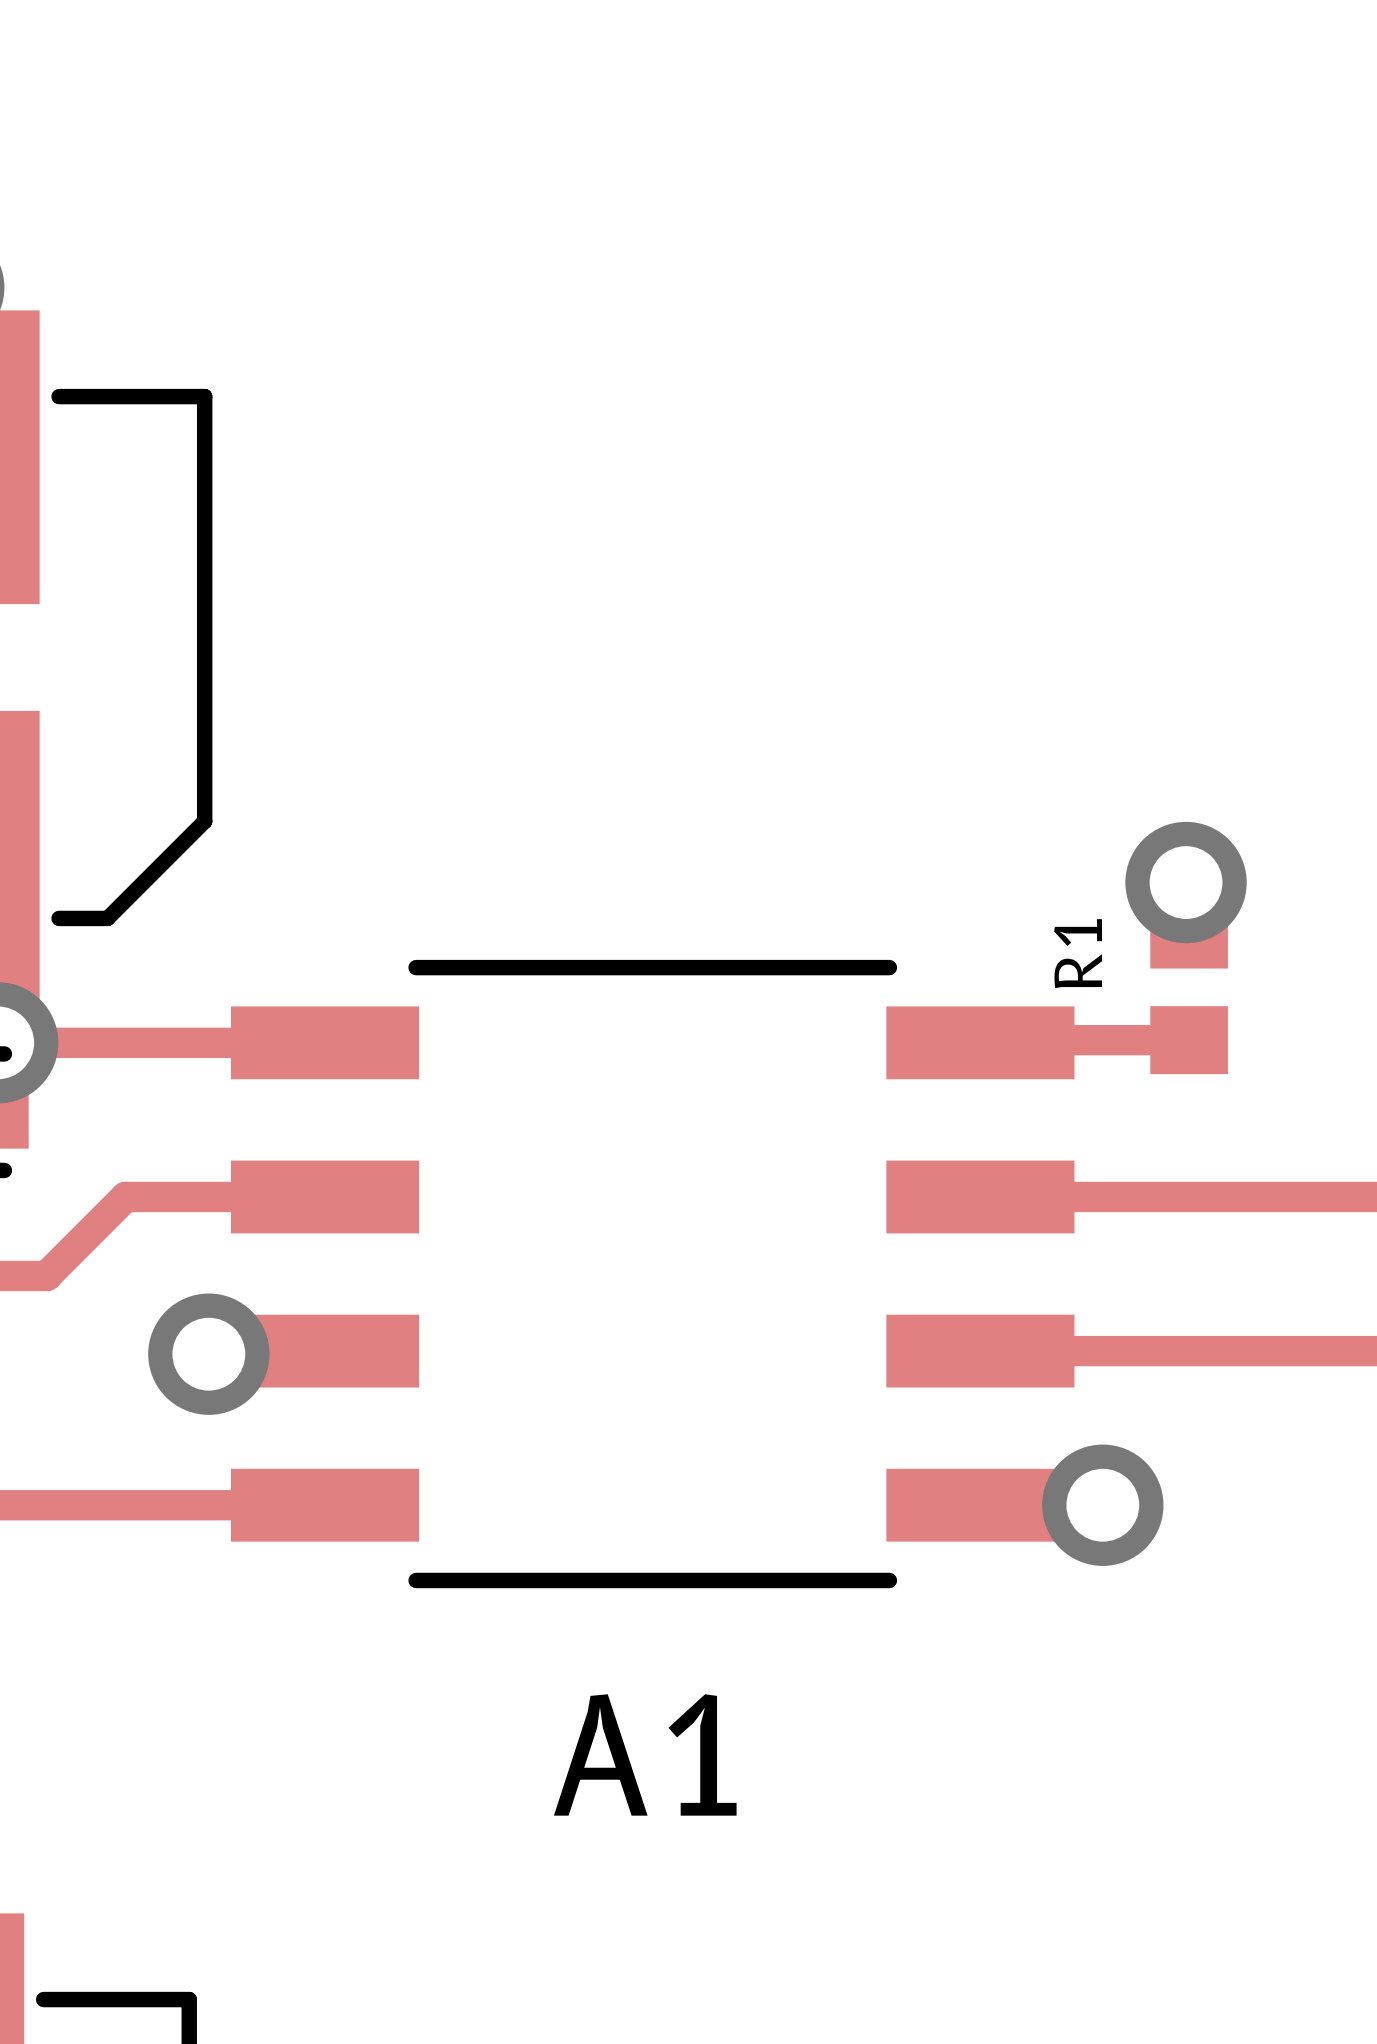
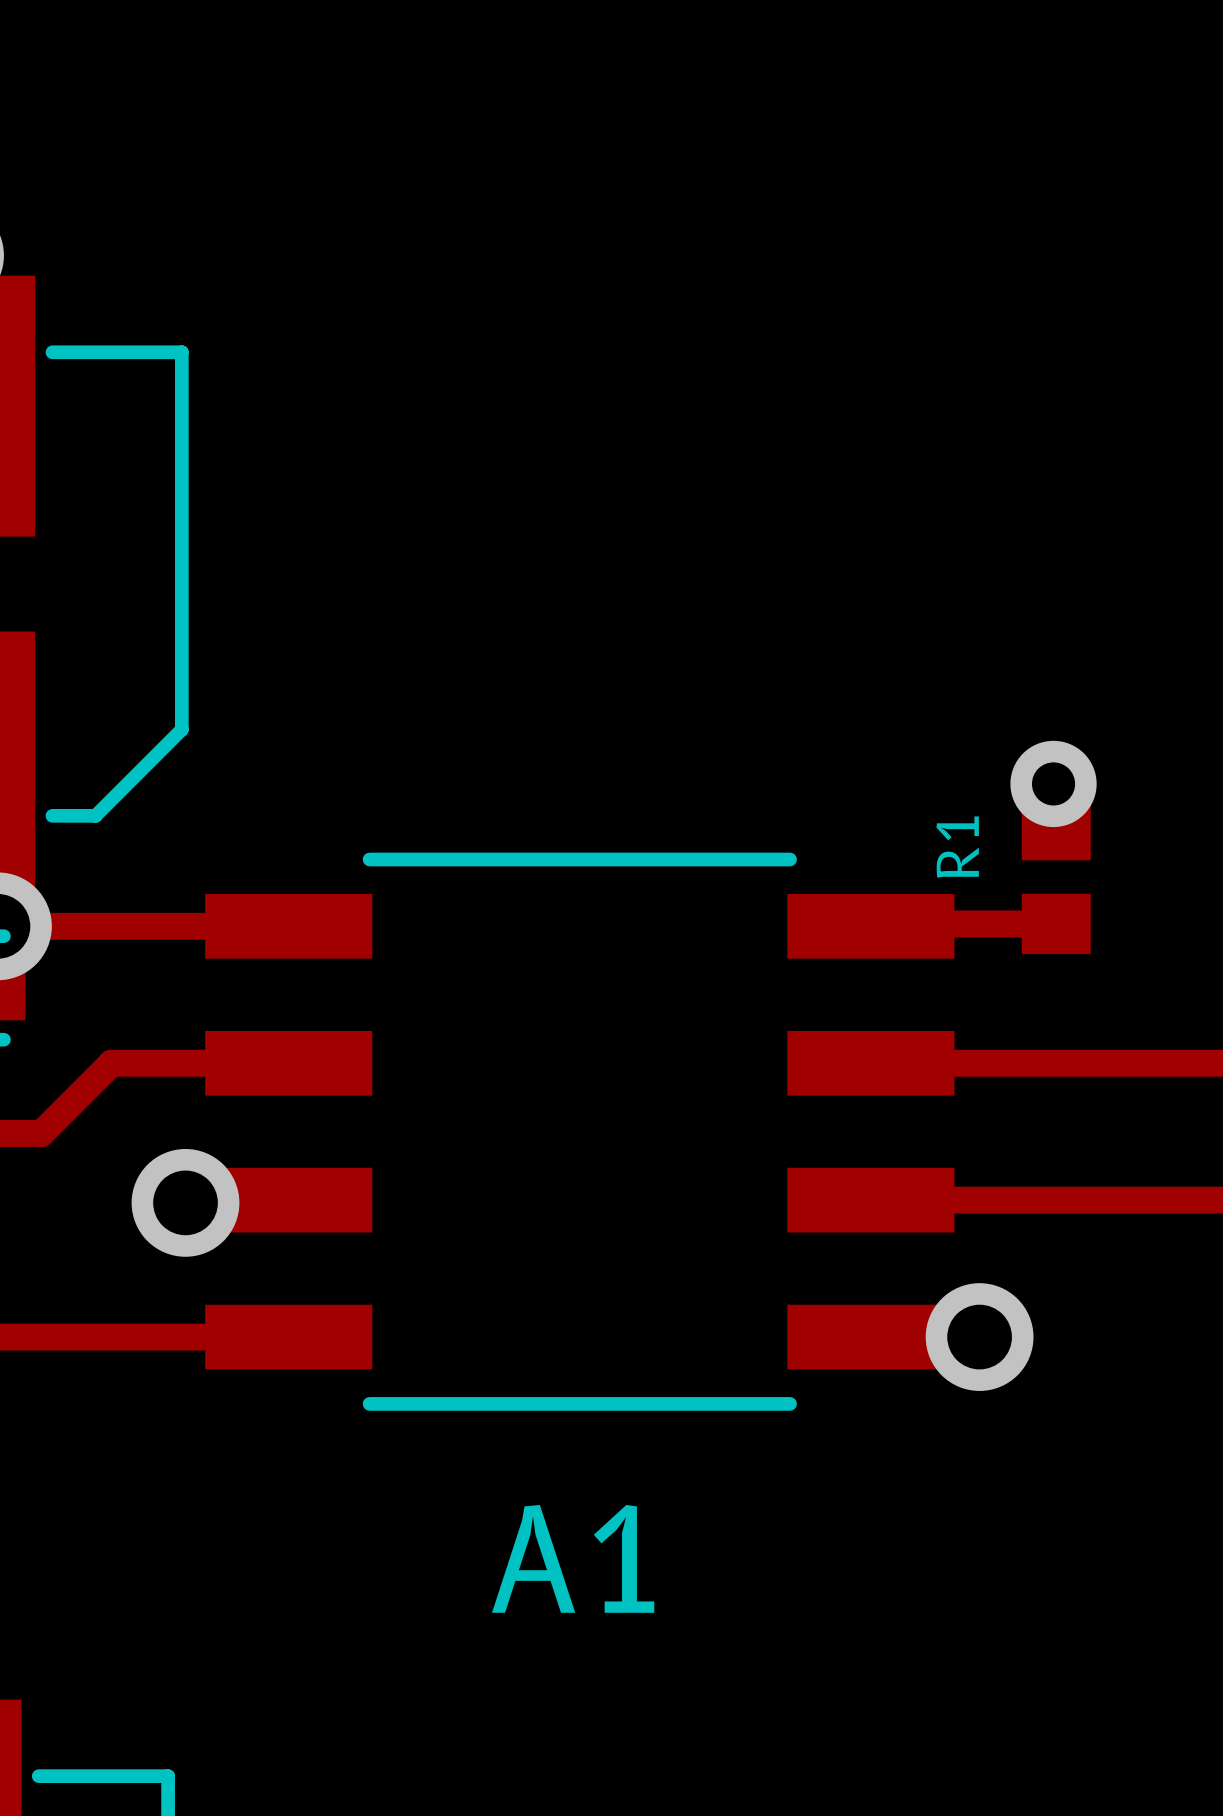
via size: [1125, 821, 1247, 944] -> [1010, 740, 1097, 828]

